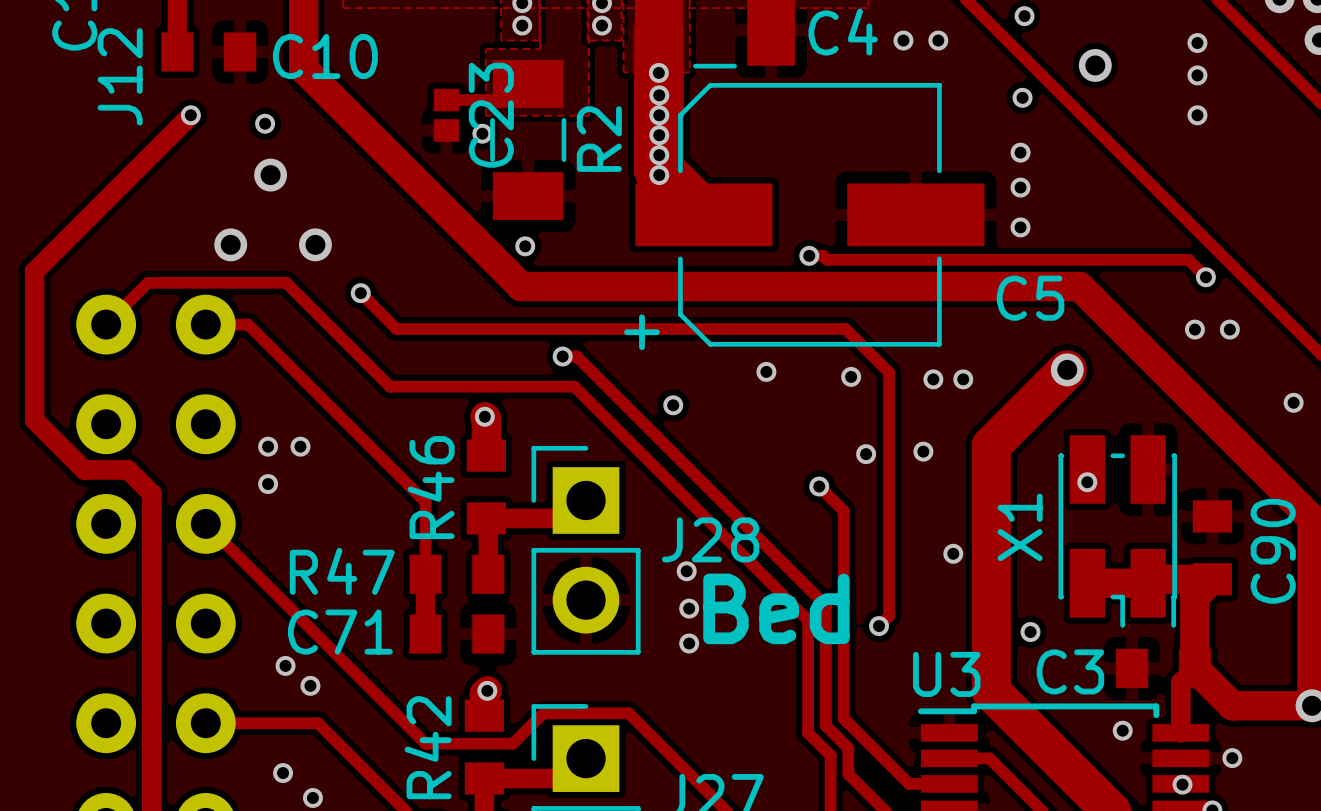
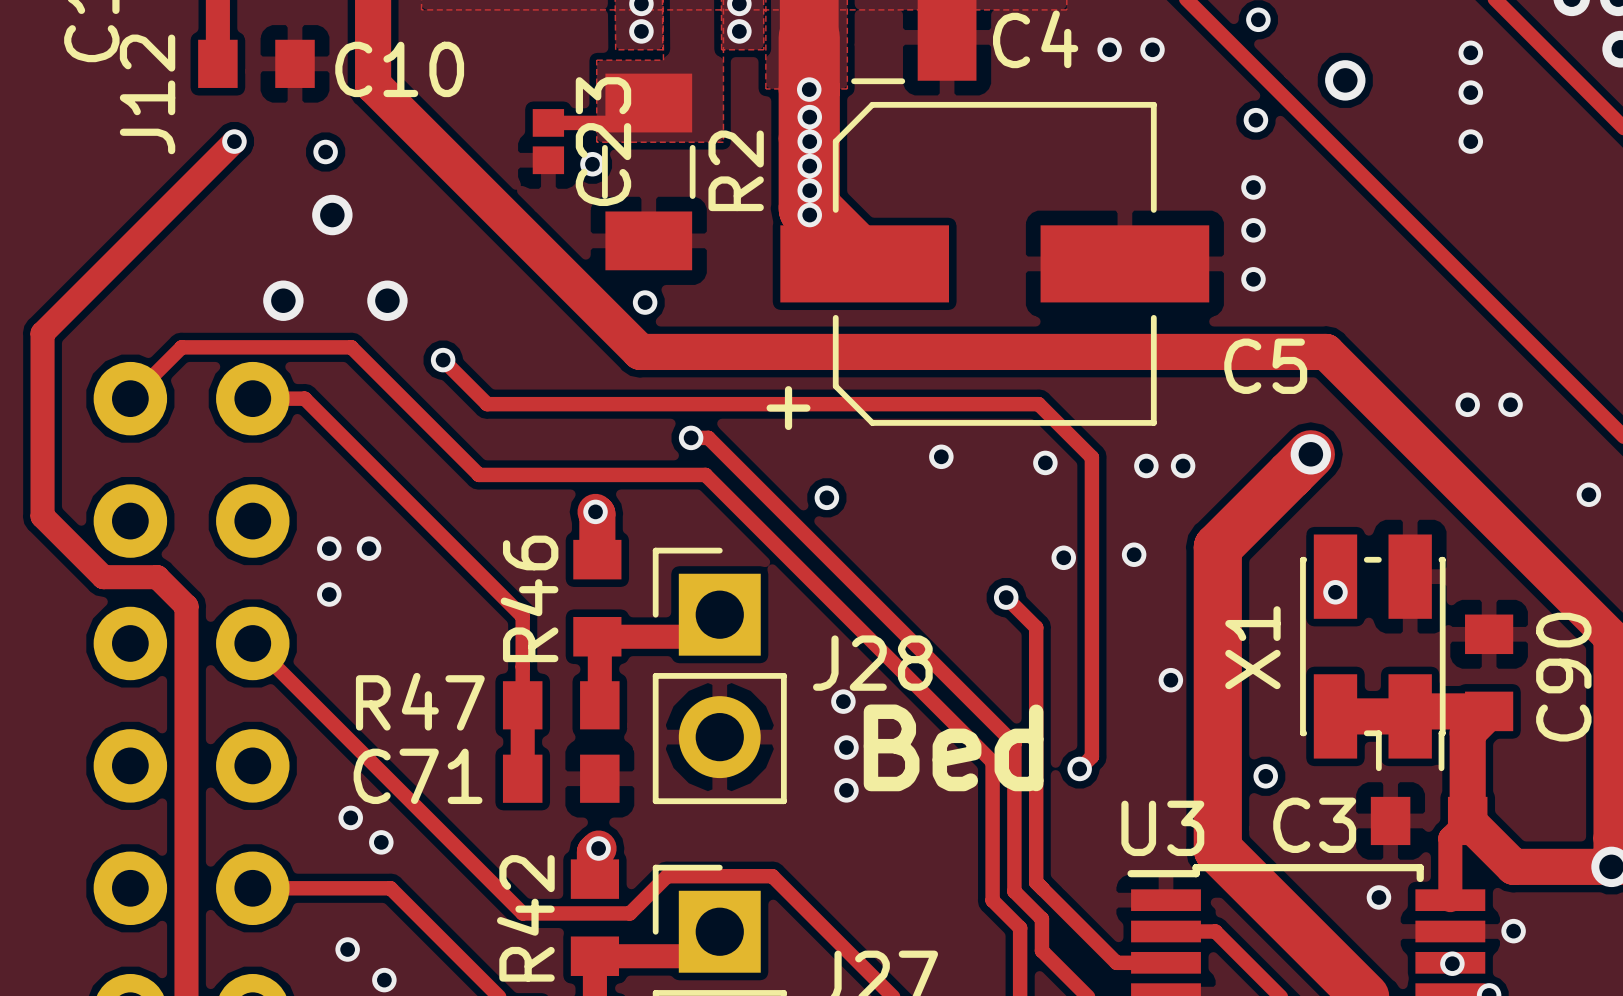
track: (809, 255) (823, 255) (827, 259) (1188, 259) (1205, 277) -> none
via: (809, 255) -> none
via: (1205, 277) -> none

